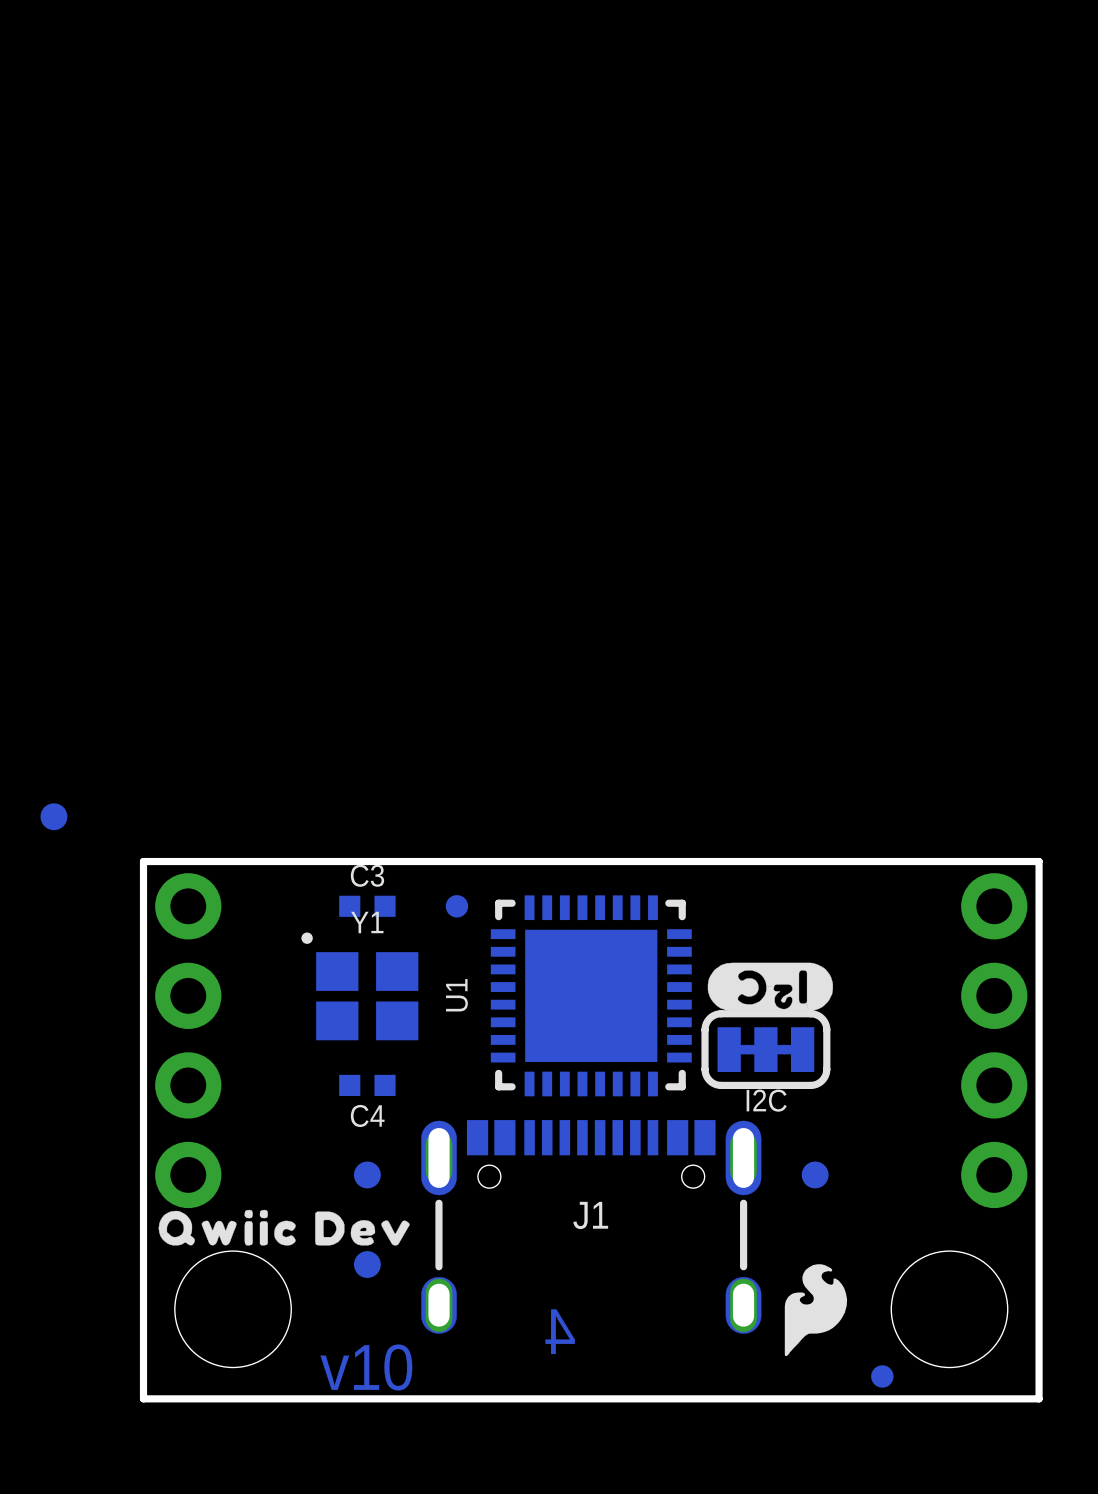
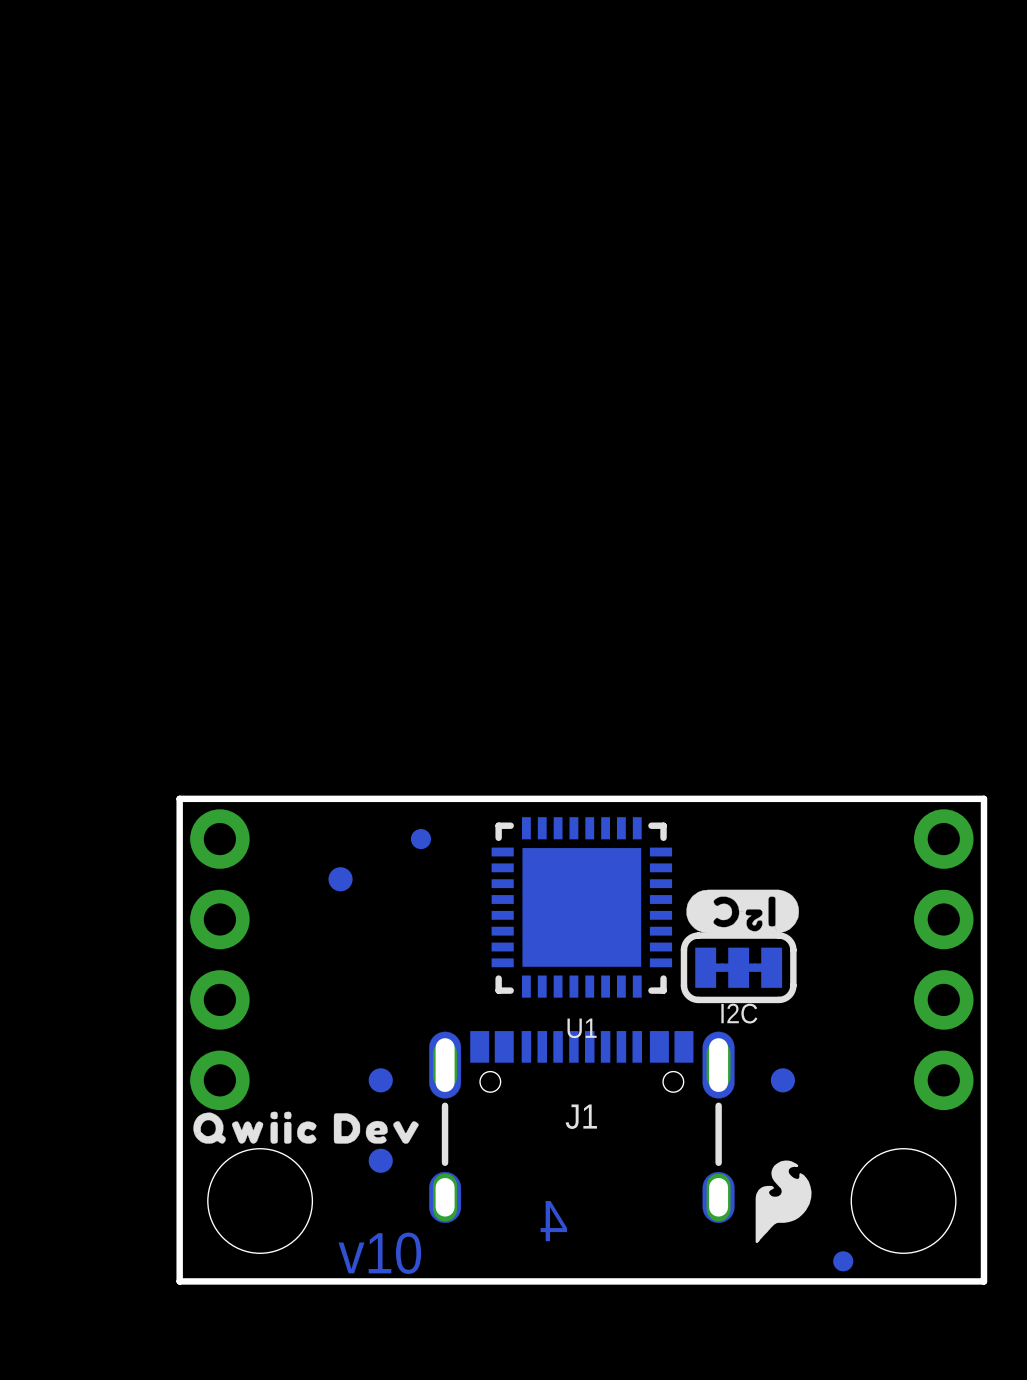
part position: (53, 816) -> (340, 879)
C3: (367, 906) -> none
part position: (456, 906) -> (420, 839)
Y1: (359, 986) -> none
U1 rotation: 0° (591, 995) -> 90° counterclockwise (581, 907)
C4: (367, 1085) -> none

